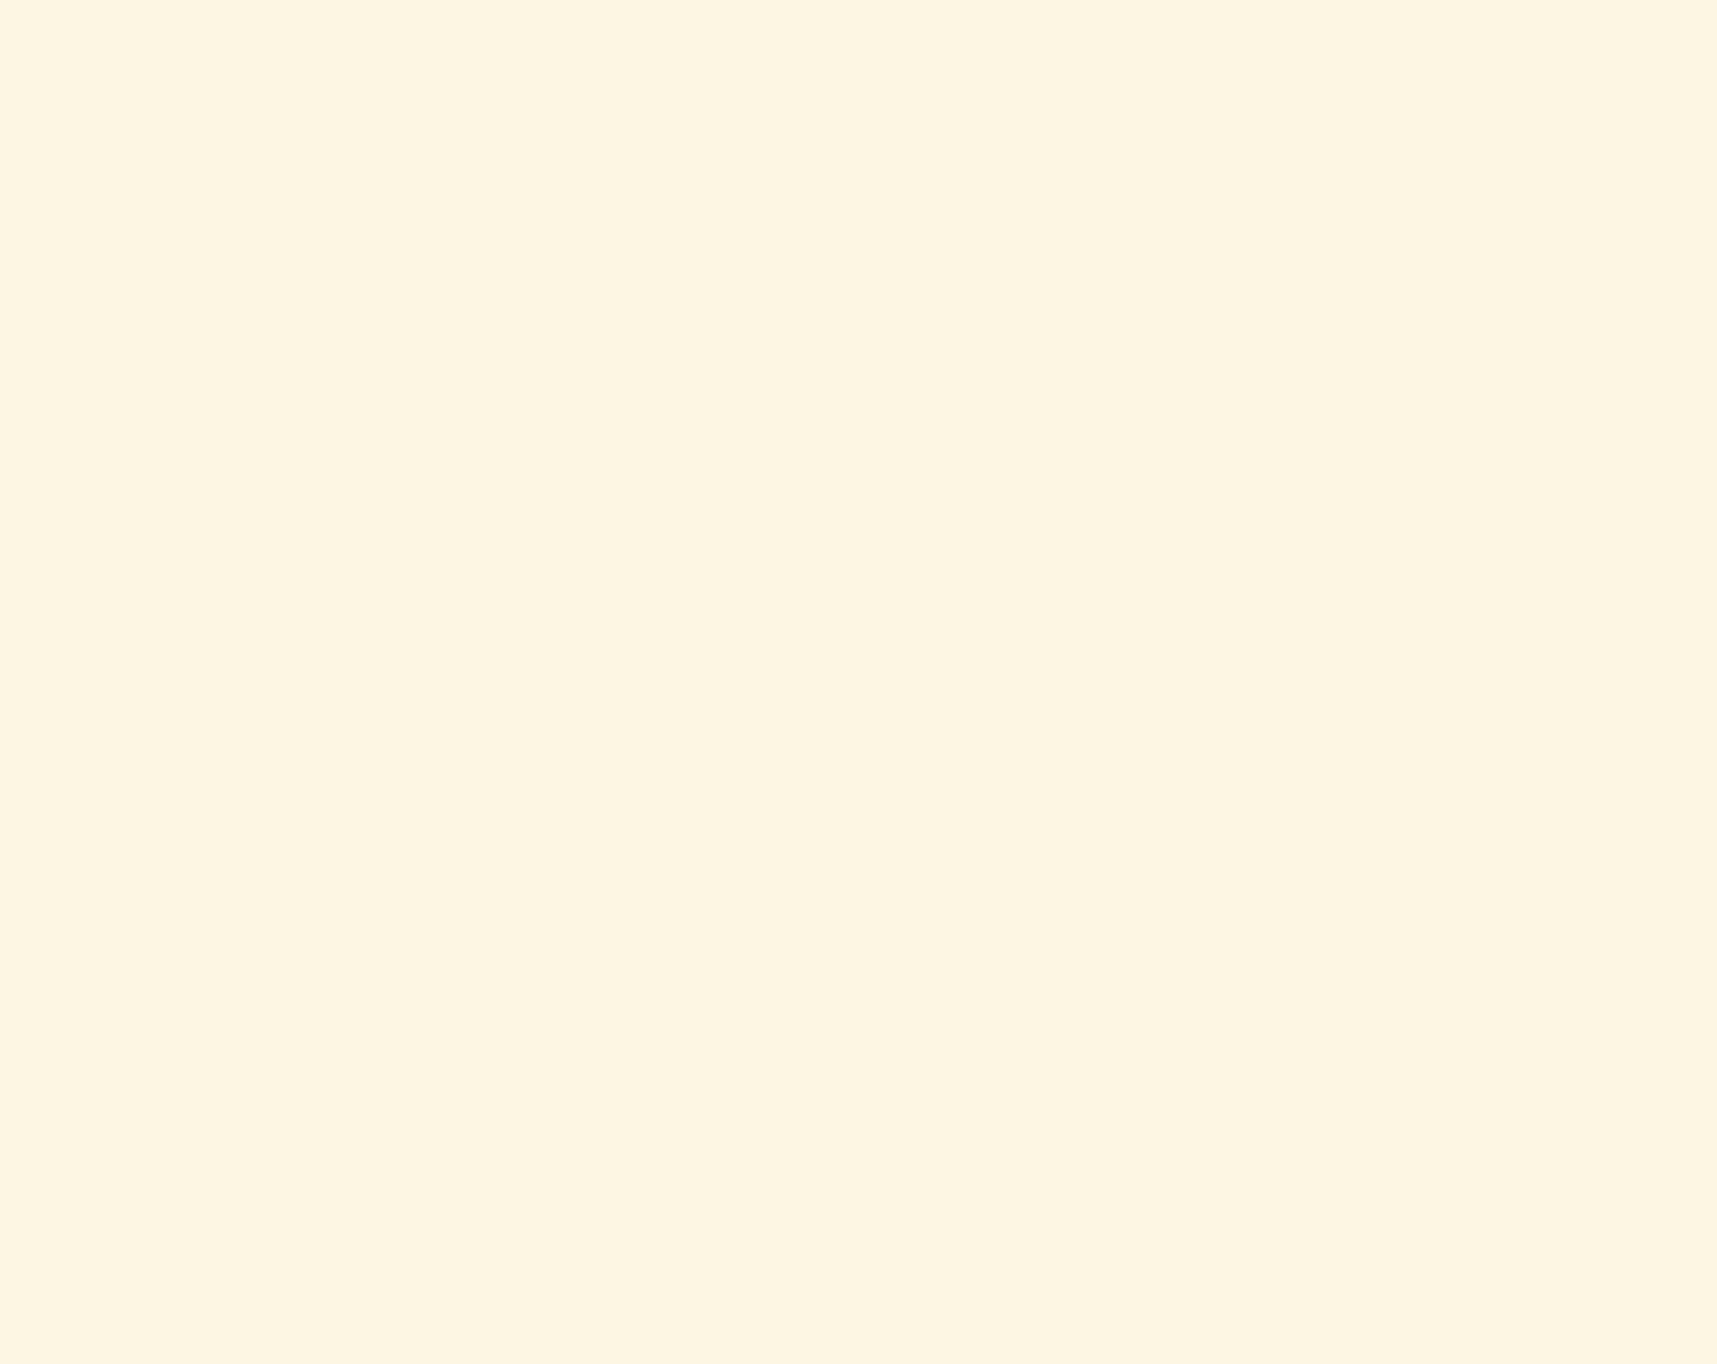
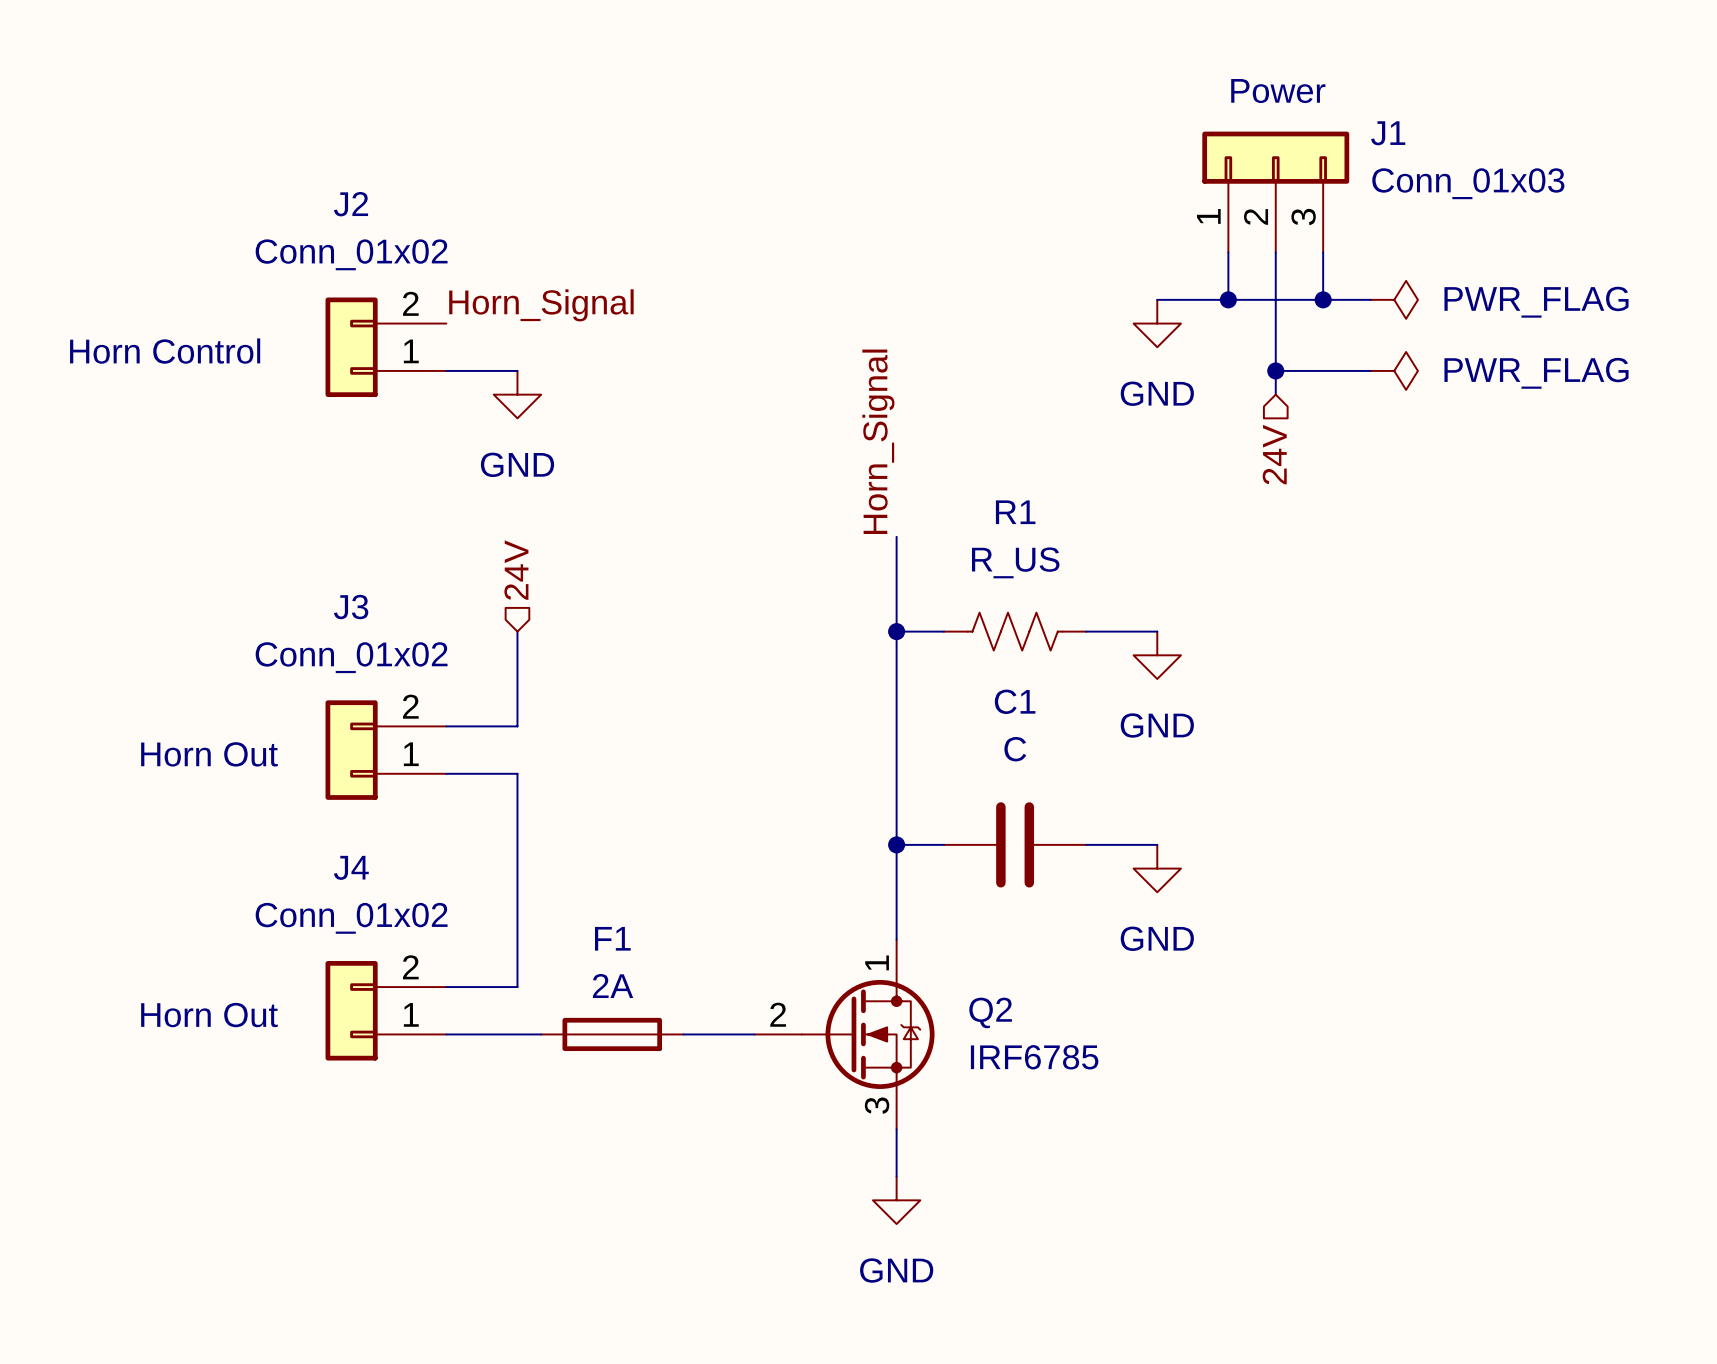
text: none -> Power (1278, 91)
J1: none -> Conn_01x03 (1275, 192)
wire: none -> (1228, 252) (1228, 299)
wire: none -> (1275, 252) (1275, 394)
wire: none -> (1323, 252) (1323, 299)
wire: none -> (1157, 299) (1370, 299)
junction: none -> (1228, 299)
junction: none -> (1323, 299)
power symbol: none -> PWR_FLAG (1394, 299)
label: none -> Horn_Signal (541, 305)
power symbol: none -> GND (1157, 323)
J2: none -> Conn_01x02 (385, 347)
text: none -> Horn Control (165, 351)
wire: none -> (446, 370) (517, 370)
wire: none -> (1275, 370) (1370, 370)
junction: none -> (1275, 370)
power symbol: none -> PWR_FLAG (1394, 370)
power symbol: none -> GND (517, 394)
label: none -> Horn_Signal (878, 441)
hierarchical label: none -> 24V (1274, 454)
wire: none -> (896, 536) (896, 939)
hierarchical label: none -> 24V (516, 570)
wire: none -> (517, 631) (517, 726) (446, 726)
wire: none -> (896, 631) (944, 631)
junction: none -> (896, 631)
R1: none -> R_US (1015, 631)
wire: none -> (1086, 631) (1157, 631)
power symbol: none -> GND (1157, 655)
J3: none -> Conn_01x02 (385, 750)
text: none -> Horn Out (209, 754)
wire: none -> (446, 773) (517, 773) (517, 987) (446, 987)
wire: none -> (896, 844) (944, 844)
junction: none -> (896, 844)
C1: none -> C (1015, 844)
wire: none -> (1086, 844) (1157, 844)
power symbol: none -> GND (1157, 868)
J4: none -> Conn_01x02 (385, 1010)
text: none -> Horn Out (209, 1015)
wire: none -> (446, 1034) (541, 1034)
F1: none -> 2A (612, 1034)
wire: none -> (683, 1034) (754, 1034)
Q2: none -> IRF6785 (844, 1034)
wire: none -> (896, 1129) (896, 1176)
power symbol: none -> GND (896, 1200)

